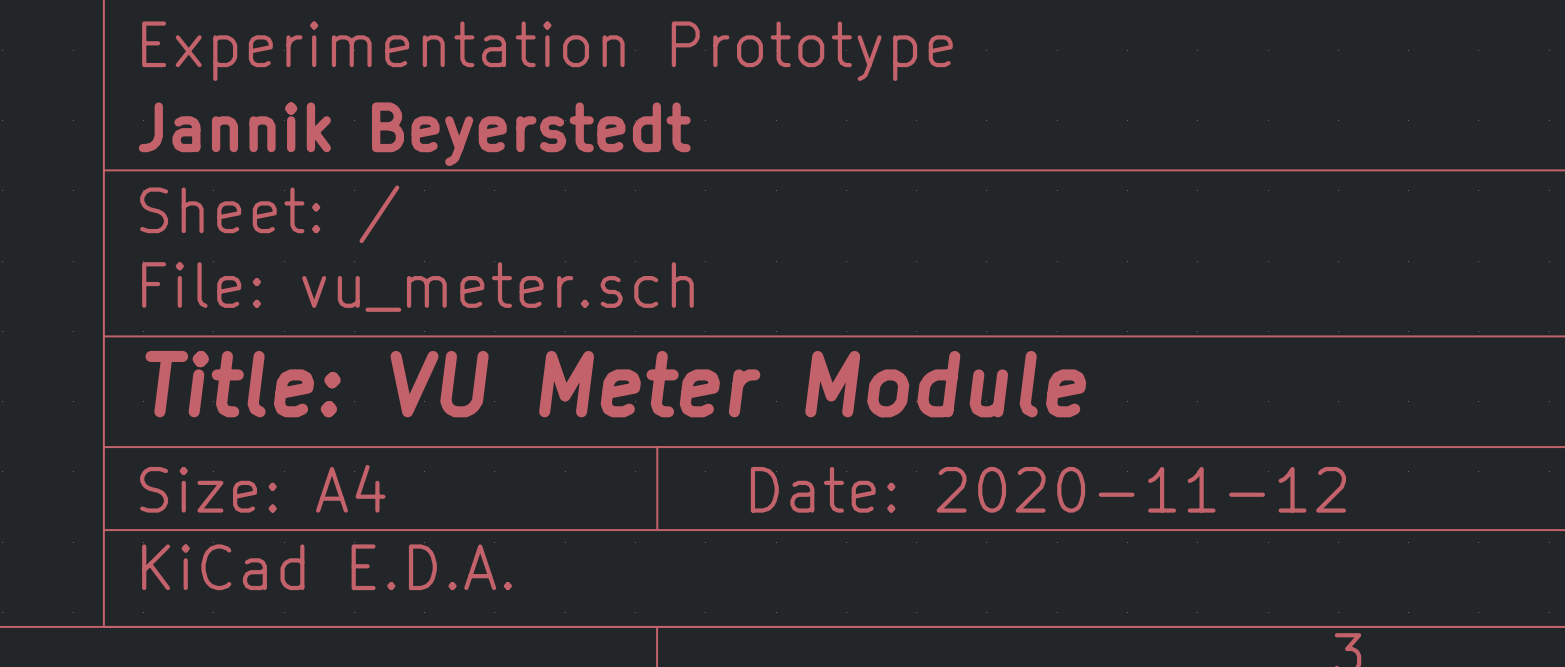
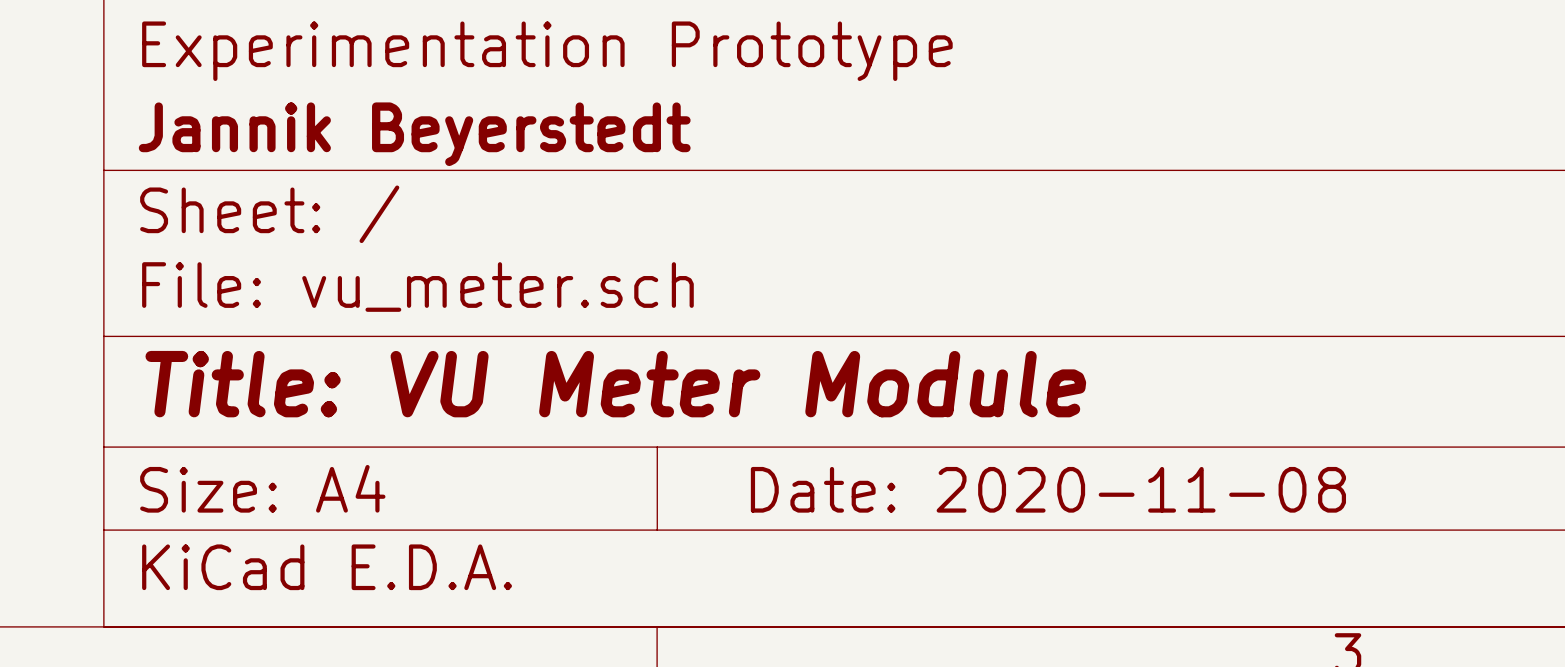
title block: Date: 2020-11-12 (1048, 489) -> Date: 2020-11-08 (1048, 489)

